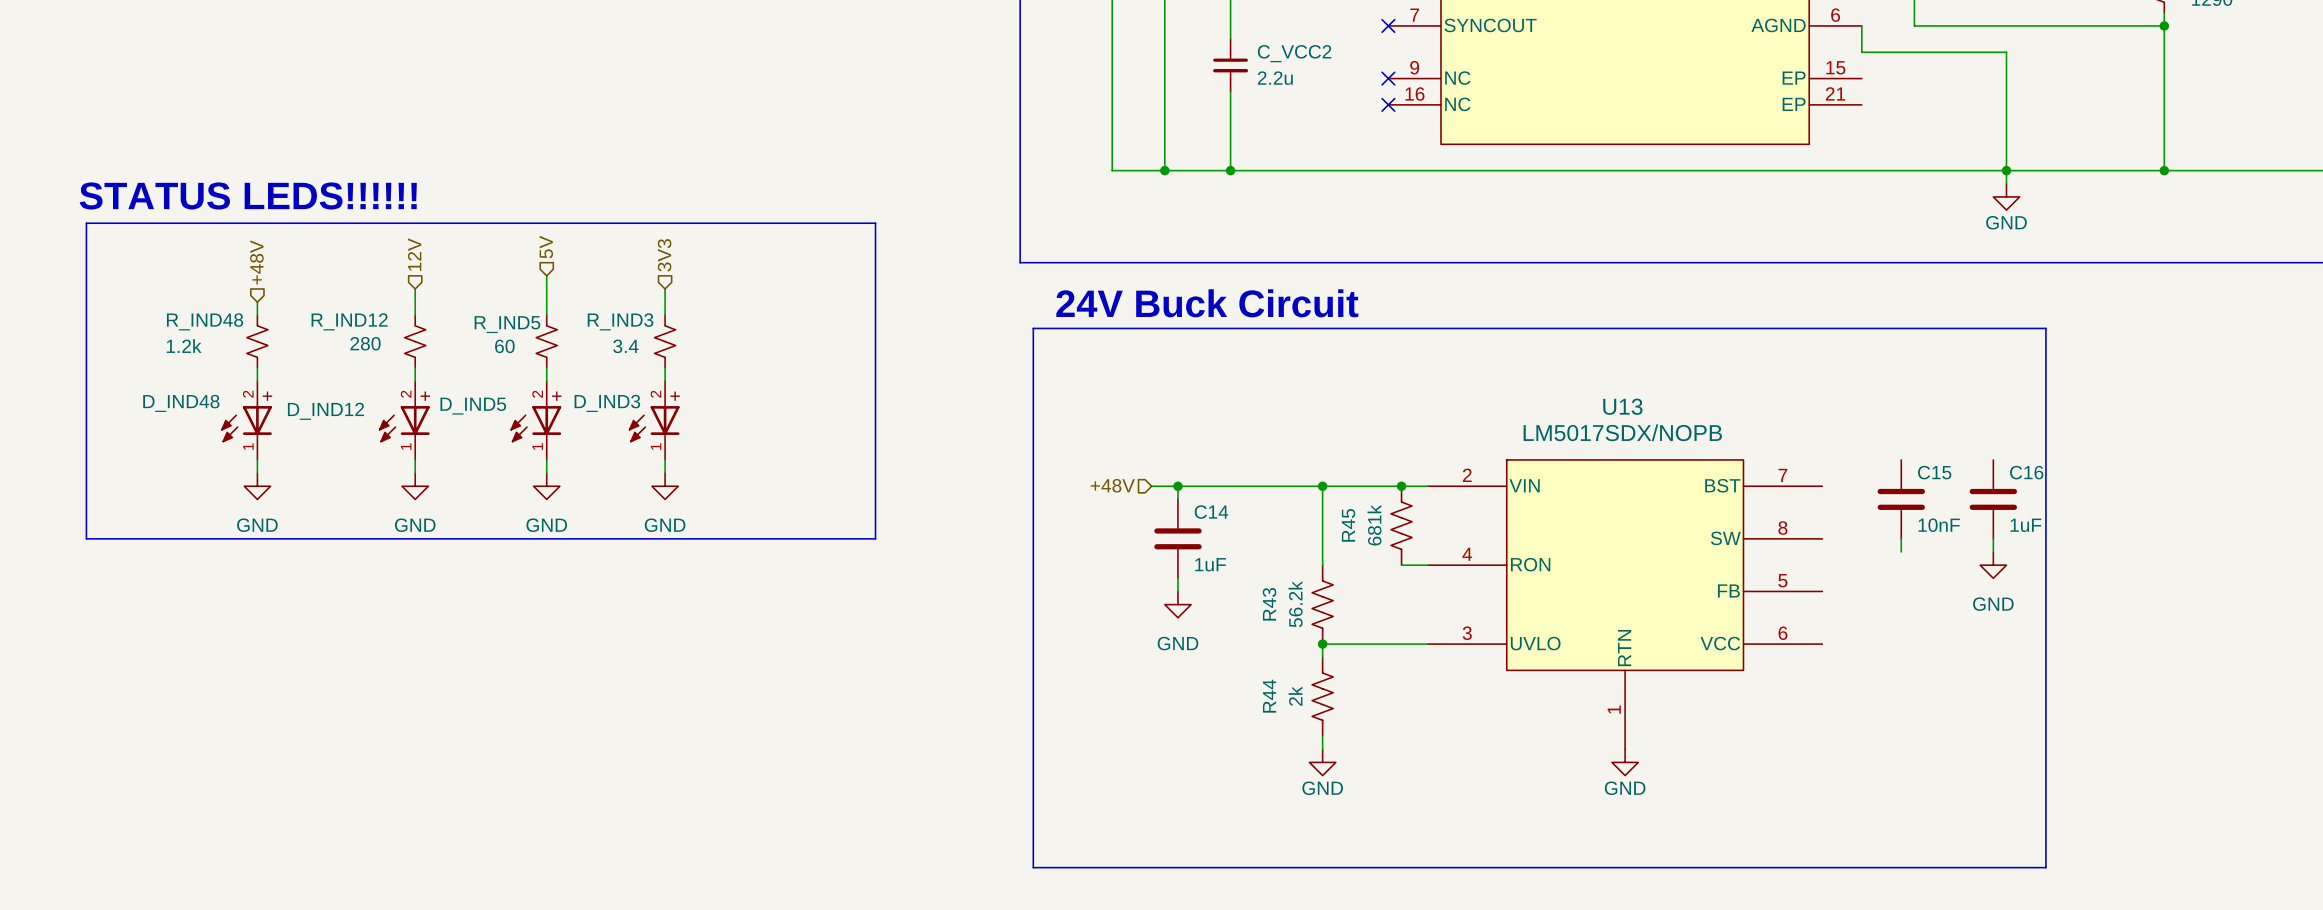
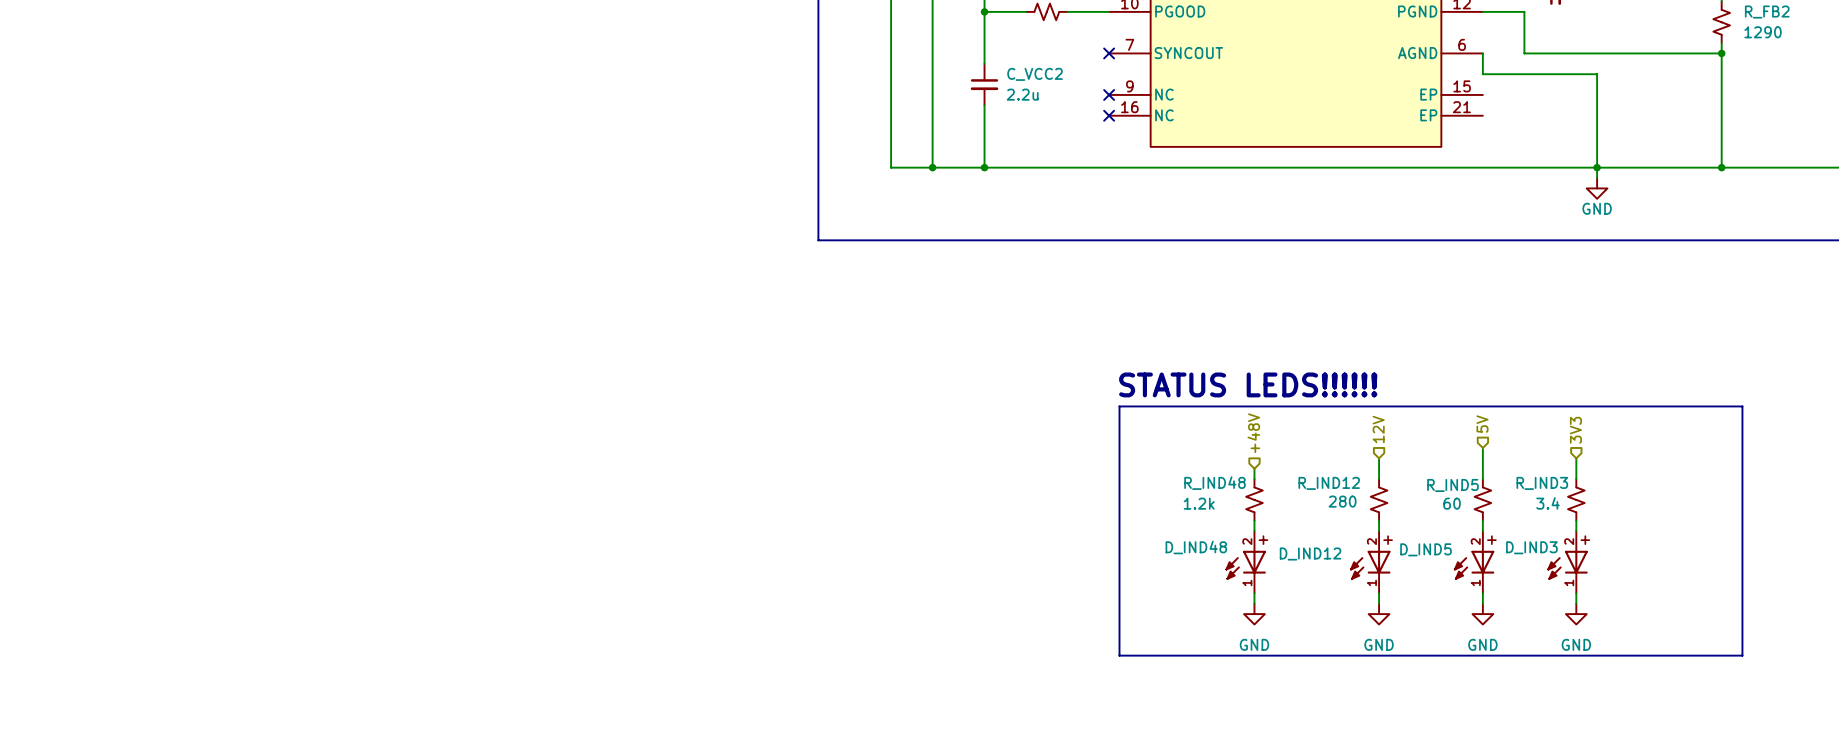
text: STATUS LEDS!!!!!! (248, 195) -> none
line: (86, 223) (875, 223) (875, 538) (86, 538) (86, 223) -> none
hierarchical label: 5V (546, 247) -> none
hierarchical label: 12V (414, 254) -> none
hierarchical label: 3V3 (664, 255) -> none
hierarchical label: +48V (256, 262) -> none
wire: (546, 275) (546, 315) -> none
wire: (415, 288) (415, 315) -> none
wire: (665, 288) (665, 315) -> none
wire: (257, 302) (257, 315) -> none
text: 24V Buck Circuit (1207, 303) -> none
line: (1033, 328) (2045, 328) (2045, 867) (1033, 867) (1033, 328) -> none
R_IND48 position: (257, 341) -> (1254, 499)
R_IND12 position: (415, 341) -> (1379, 499)
R_IND5 position: (546, 341) -> (1482, 499)
R_IND3 position: (665, 341) -> (1576, 499)
wire: (257, 367) (257, 381) -> none
wire: (415, 367) (415, 381) -> none
wire: (546, 367) (546, 381) -> none
wire: (665, 367) (665, 381) -> none
D_IND48 position: (246, 420) -> (1245, 562)
D_IND12 position: (404, 420) -> (1370, 562)
D_IND5 position: (535, 420) -> (1474, 562)
D_IND3 position: (654, 420) -> (1567, 562)
text: none -> STATUS LEDS!!!!!! (1248, 384)
wire: (257, 459) (257, 473) -> none
wire: (415, 459) (415, 473) -> none
wire: (546, 459) (546, 473) -> none
wire: (665, 459) (665, 473) -> none
line: none -> (1119, 406) (1742, 406) (1742, 655) (1119, 655) (1119, 406)
hierarchical label: +48V (1112, 485) -> none
power symbol: GND (257, 486) -> none
power symbol: GND (415, 486) -> none
power symbol: GND (546, 486) -> none
power symbol: GND (665, 486) -> none
wire: (1151, 486) (1427, 486) -> none
wire: (1177, 486) (1177, 499) -> none
junction: (1177, 486) -> none
wire: (1322, 486) (1322, 565) -> none
junction: (1322, 486) -> none
junction: (1401, 486) -> none
hierarchical label: none -> 5V (1482, 424)
C15: 10nF (1901, 499) -> none
C16: 1uF (1993, 499) -> none
hierarchical label: none -> 12V (1378, 429)
hierarchical label: none -> 3V3 (1575, 430)
hierarchical label: none -> +48V (1253, 433)
R45: 681k (1401, 525) -> none
wire: none -> (1482, 447) (1482, 479)
C14: 1uF (1177, 538) -> none
wire: (1901, 538) (1901, 552) -> (1482, 520) (1482, 531)
wire: none -> (1576, 458) (1576, 479)
wire: (1993, 538) (1993, 552) -> (1576, 520) (1576, 531)
wire: (1401, 565) (1427, 565) -> none
power symbol: GND (1993, 565) -> none
wire: (1177, 578) (1177, 591) -> none
power symbol: GND (1177, 604) -> none
R43: 56.2k (1322, 604) -> none
U13: LM5017SDX/NOPB (1625, 604) -> none
junction: (1322, 644) -> none
wire: (1427, 644) (1322, 644) (1322, 657) -> none
R44: 2k (1322, 696) -> none
wire: none -> (1379, 593) (1379, 603)
wire: none -> (1482, 593) (1482, 603)
wire: none -> (1576, 593) (1576, 603)
wire: (1322, 736) (1322, 749) -> (1254, 593) (1254, 603)
power symbol: none -> GND (1254, 614)
power symbol: none -> GND (1379, 614)
power symbol: none -> GND (1482, 614)
power symbol: none -> GND (1576, 614)
power symbol: GND (1322, 762) -> none
power symbol: GND (1625, 762) -> none

